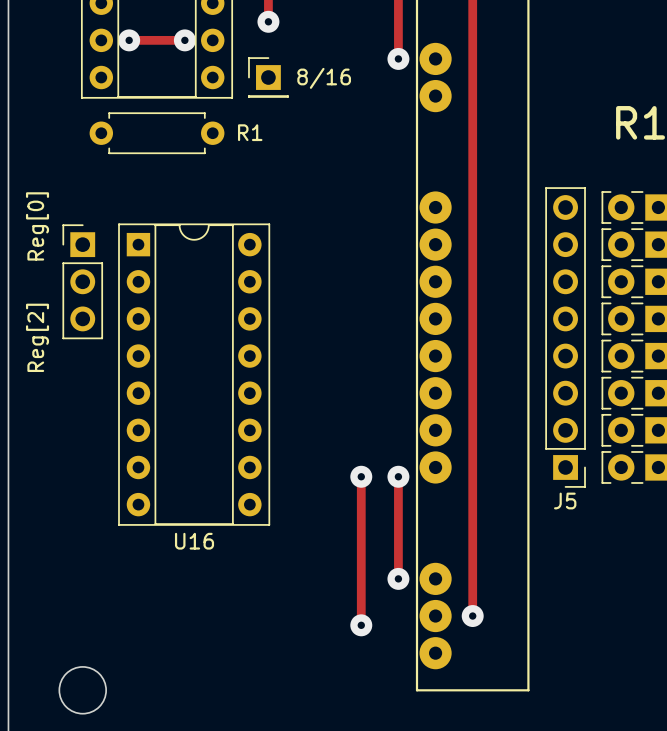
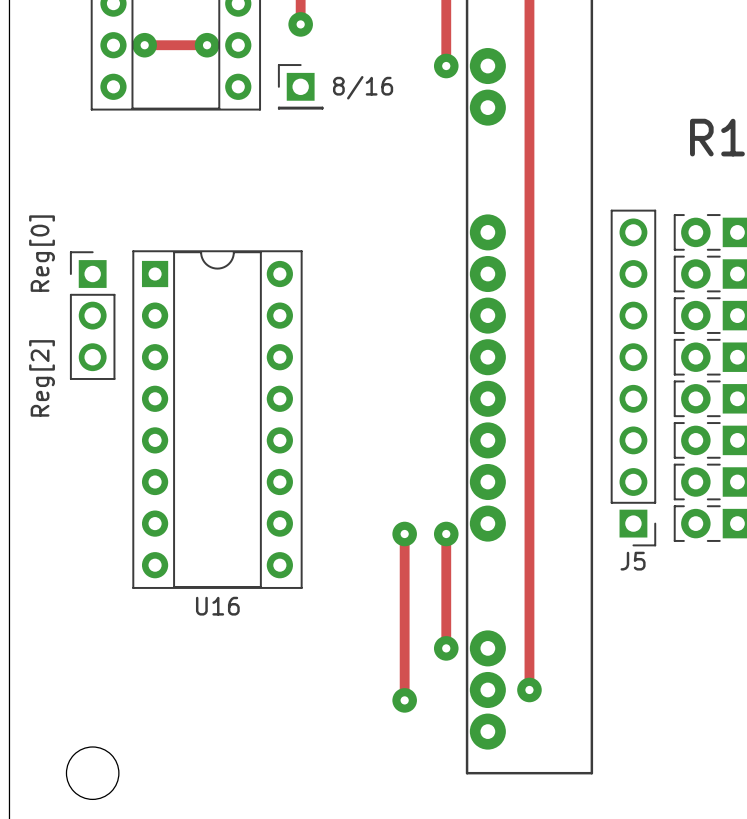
R1: (157, 133) -> none

